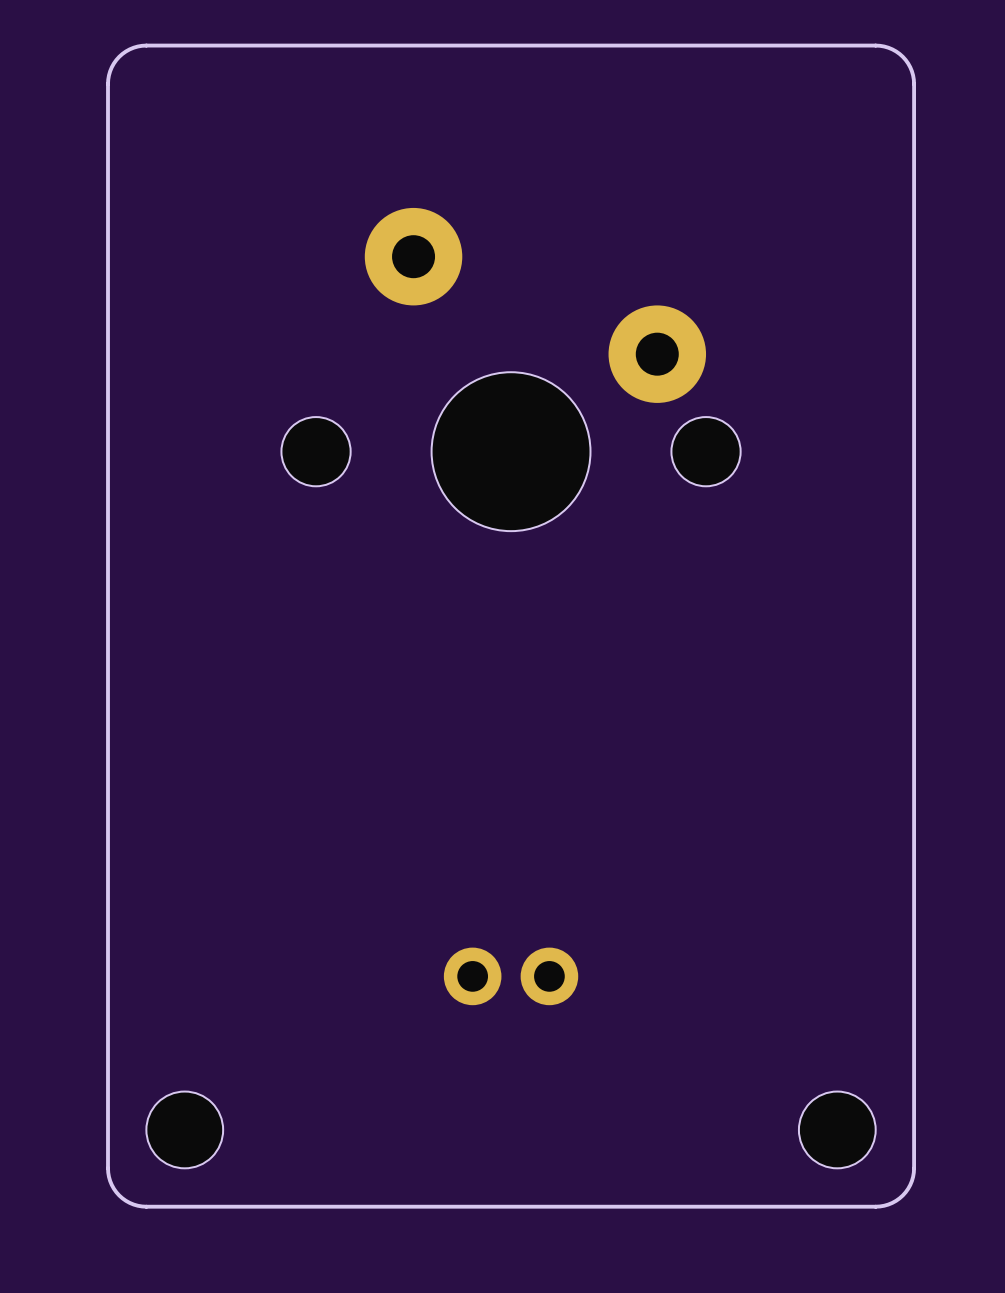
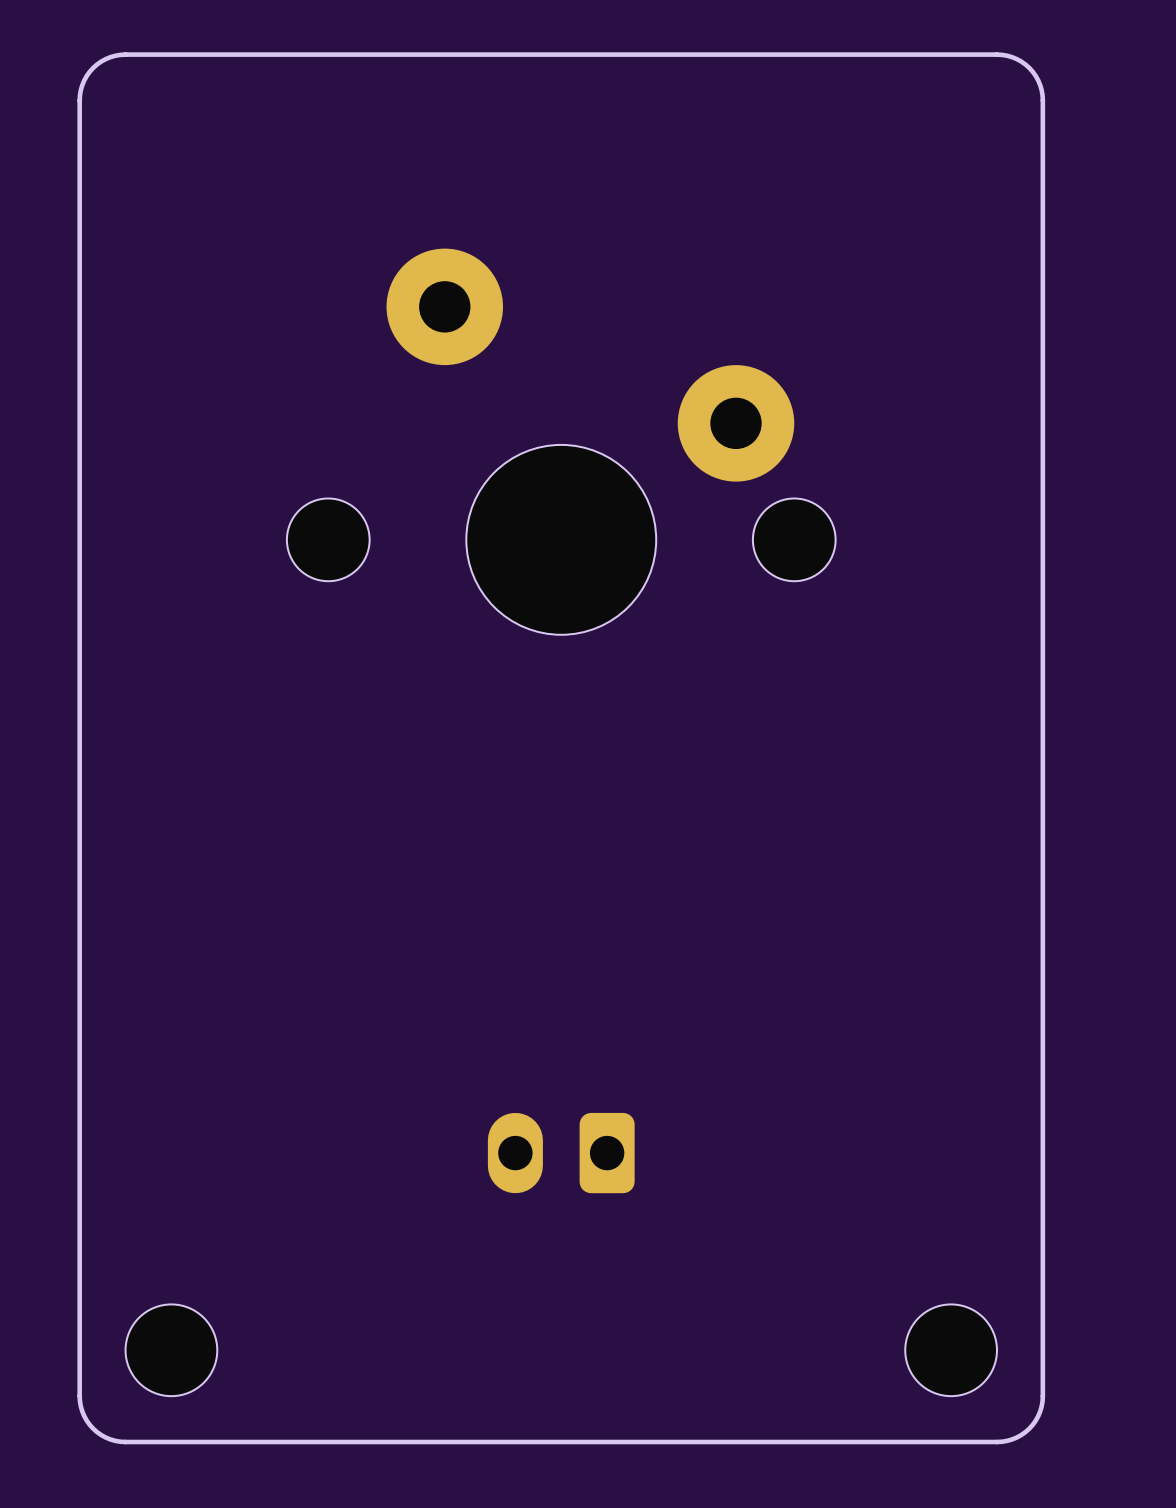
part footprint: [443, 947, 579, 1006] -> [487, 1112, 635, 1194]

